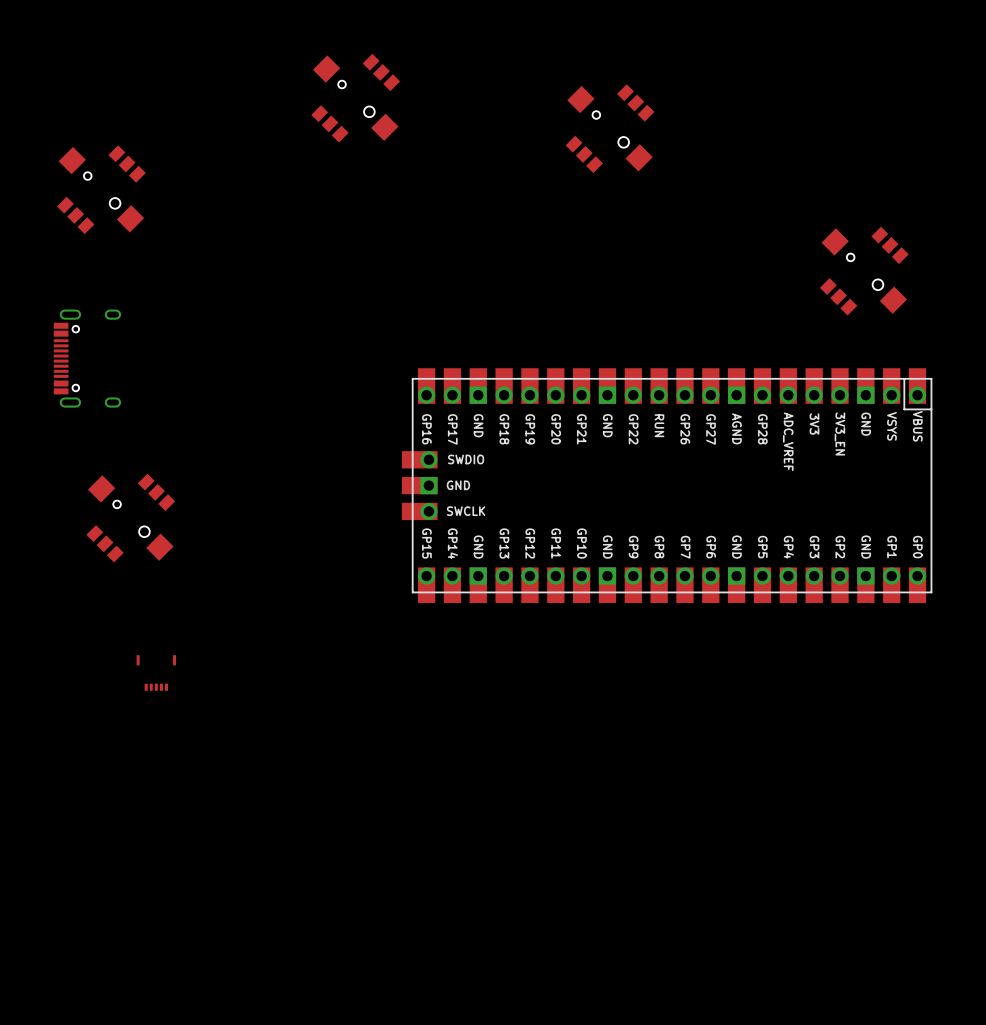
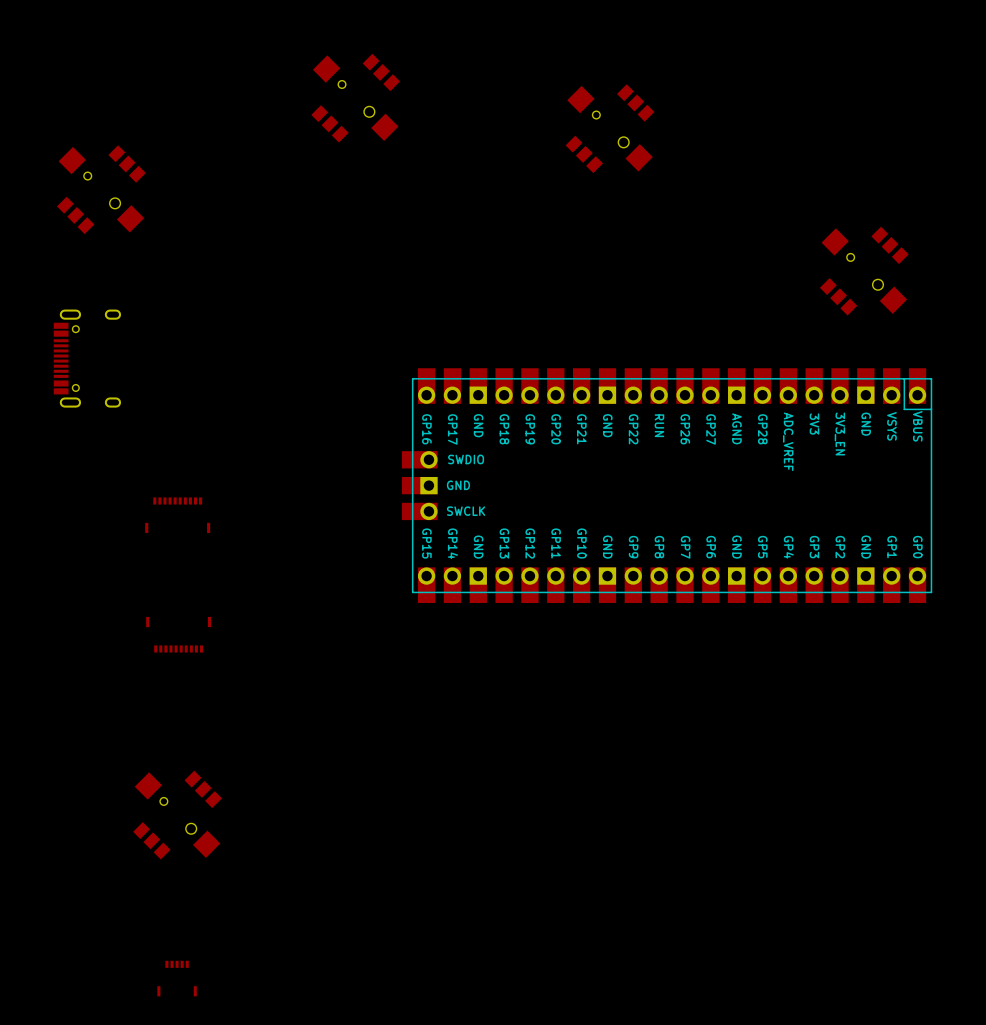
part: none -> (177, 515)
part: (130, 518) -> none
part: none -> (178, 634)
part: (156, 672) -> none
part: none -> (177, 815)
part: none -> (177, 978)

